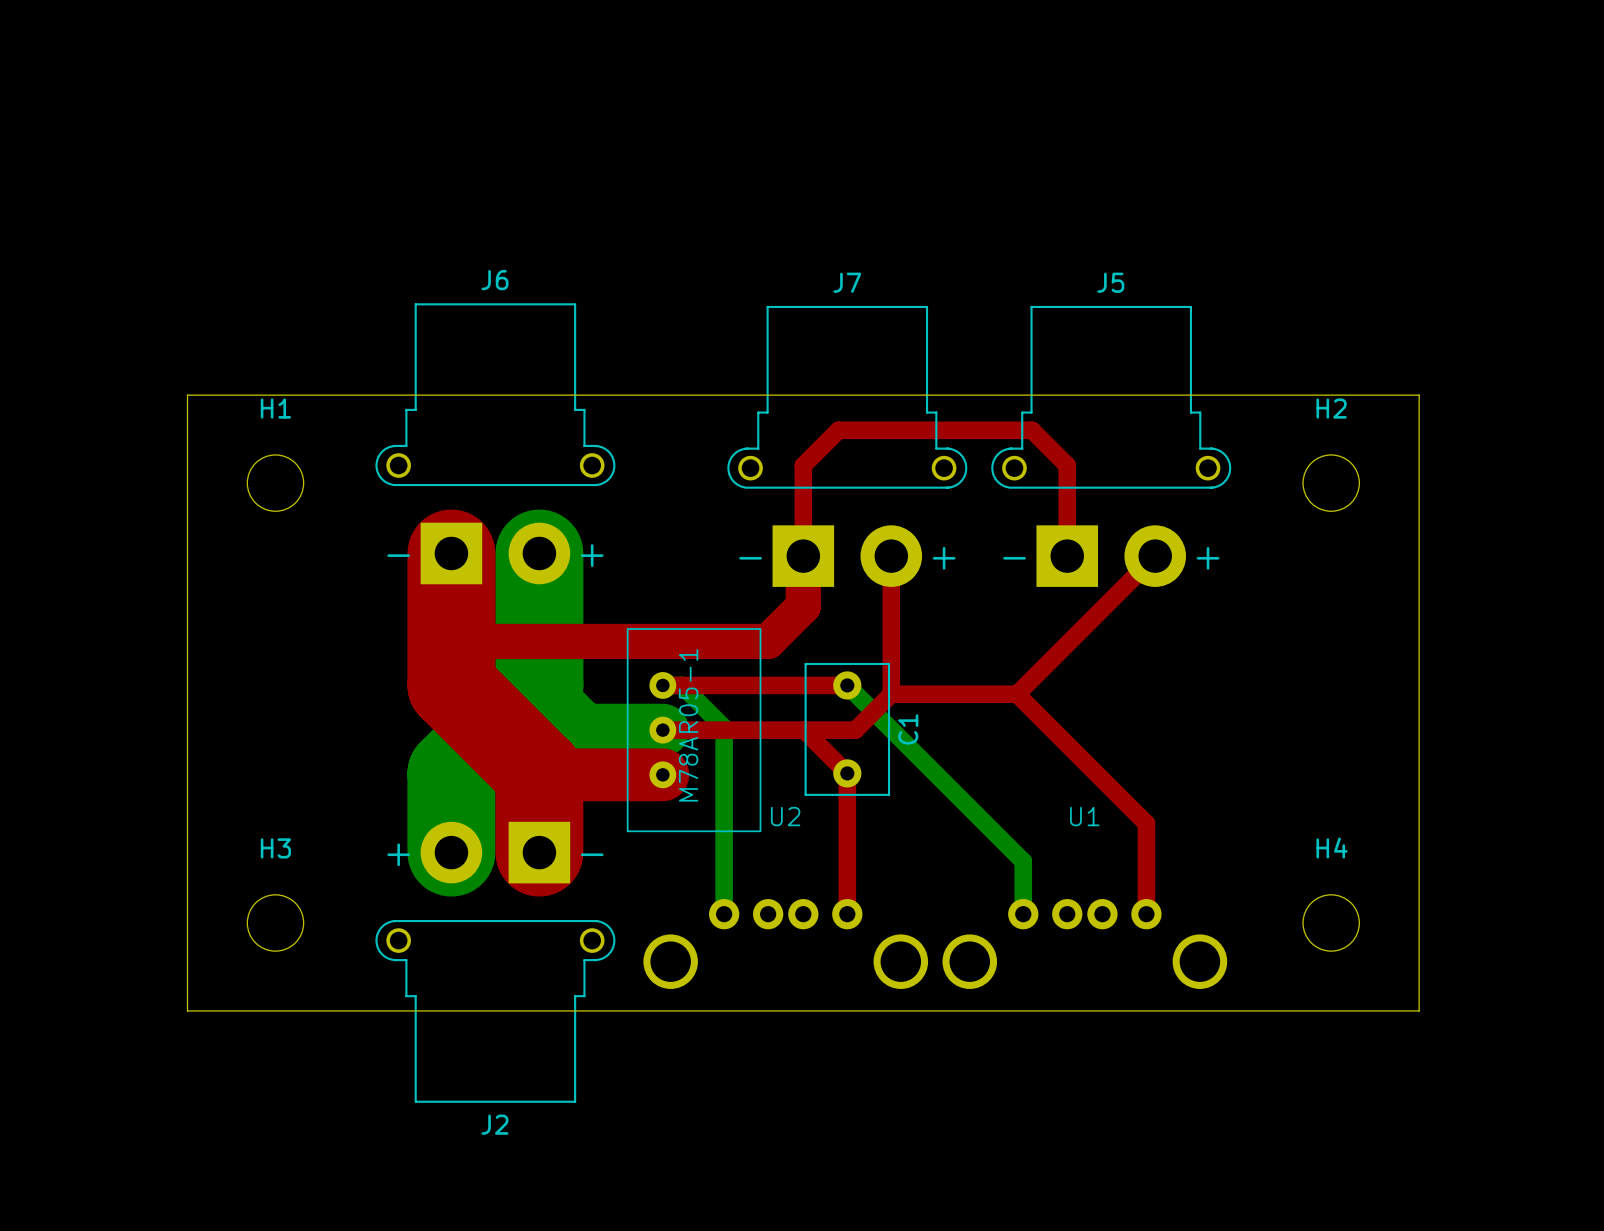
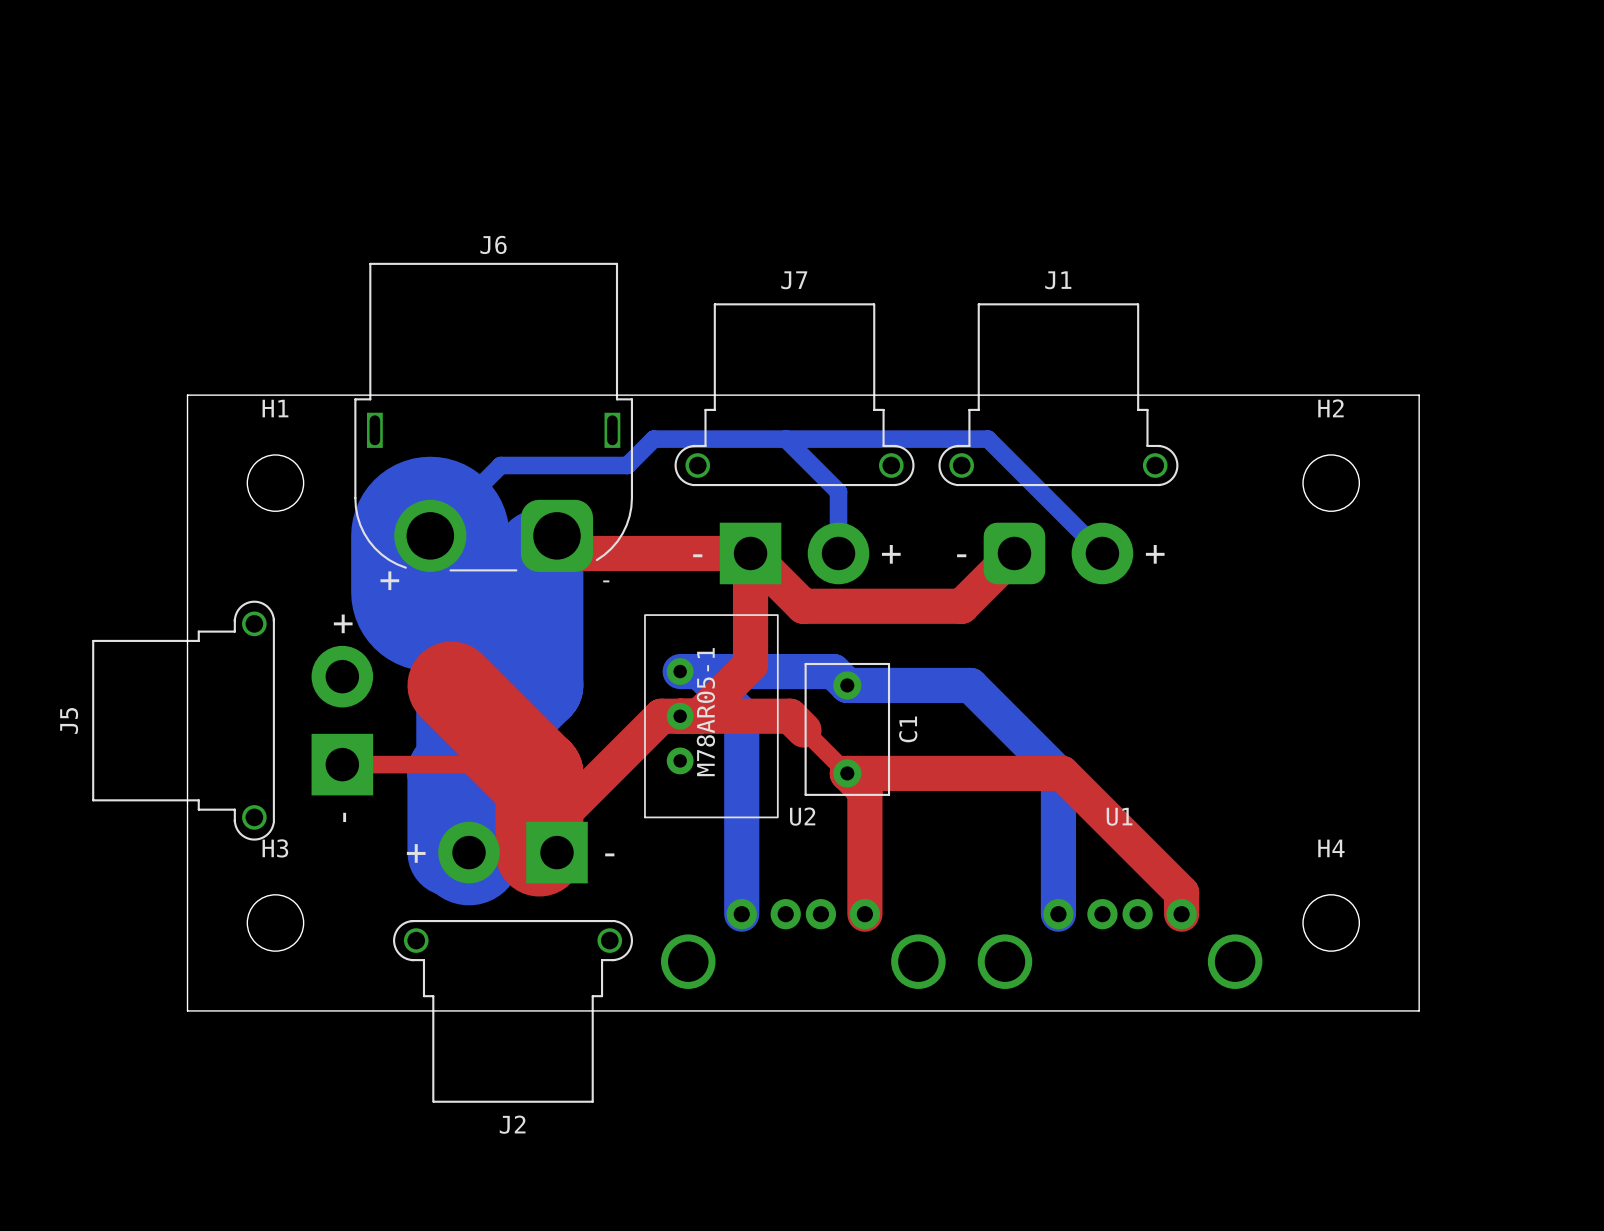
J6 footprint: [375, 303, 616, 585] -> [354, 262, 634, 572]
bottom track: none -> (785, 439) (838, 491) (838, 553)
J1: none -> (1058, 443)
J7 position: (847, 446) -> (794, 443)
J5 rotation: 0° (1111, 446) -> 90° counterclockwise (232, 720)
J5 position: (1111, 446) -> (232, 720)
top track: none -> (557, 535) (574, 553) (750, 553)
top track: (451, 553) (451, 685) (495, 641) (768, 641) (803, 606) (803, 465) (838, 430) (1032, 430) (1067, 465) (1067, 556) -> none
top track: none -> (750, 553) (803, 606) (961, 606) (1014, 553)
top track: none -> (750, 553) (750, 664) (699, 716)
bottom track: none -> (1102, 553) (988, 439) (653, 439) (627, 465) (500, 465) (430, 535) (430, 592) (469, 630) (469, 852)
top track: (891, 556) (891, 694) -> none
top track: (1155, 556) (1017, 694) -> none
bottom track: none -> (680, 671) (833, 671) (847, 685) (970, 685) (1058, 773) (1058, 914)
bottom track: none -> (699, 671) (741, 714) (741, 914)
bottom track: (539, 685) (584, 730) (662, 730) -> none
top track: (662, 685) (847, 685) -> none
bottom track: (662, 685) (681, 685) (724, 727) (724, 914) -> none
bottom track: (847, 685) (1023, 861) (1023, 914) -> none
top track: (891, 694) (1017, 694) -> none
top track: (891, 694) (855, 730) (662, 730) -> none
top track: (1017, 694) (1146, 823) (1146, 914) -> none
M78AR05-1 position: (694, 730) -> (711, 716)
top track: none -> (804, 730) (790, 716) (661, 716) (557, 820) (557, 852) (469, 764) (342, 764)
top track: (539, 773) (662, 774) -> none
top track: (847, 773) (847, 914) -> none
top track: none -> (864, 914) (864, 791) (847, 773) (1062, 773) (1181, 892) (1181, 914)
U2 position: (785, 944) -> (803, 944)
U1 position: (1084, 944) -> (1120, 944)
J2 position: (495, 962) -> (513, 962)

